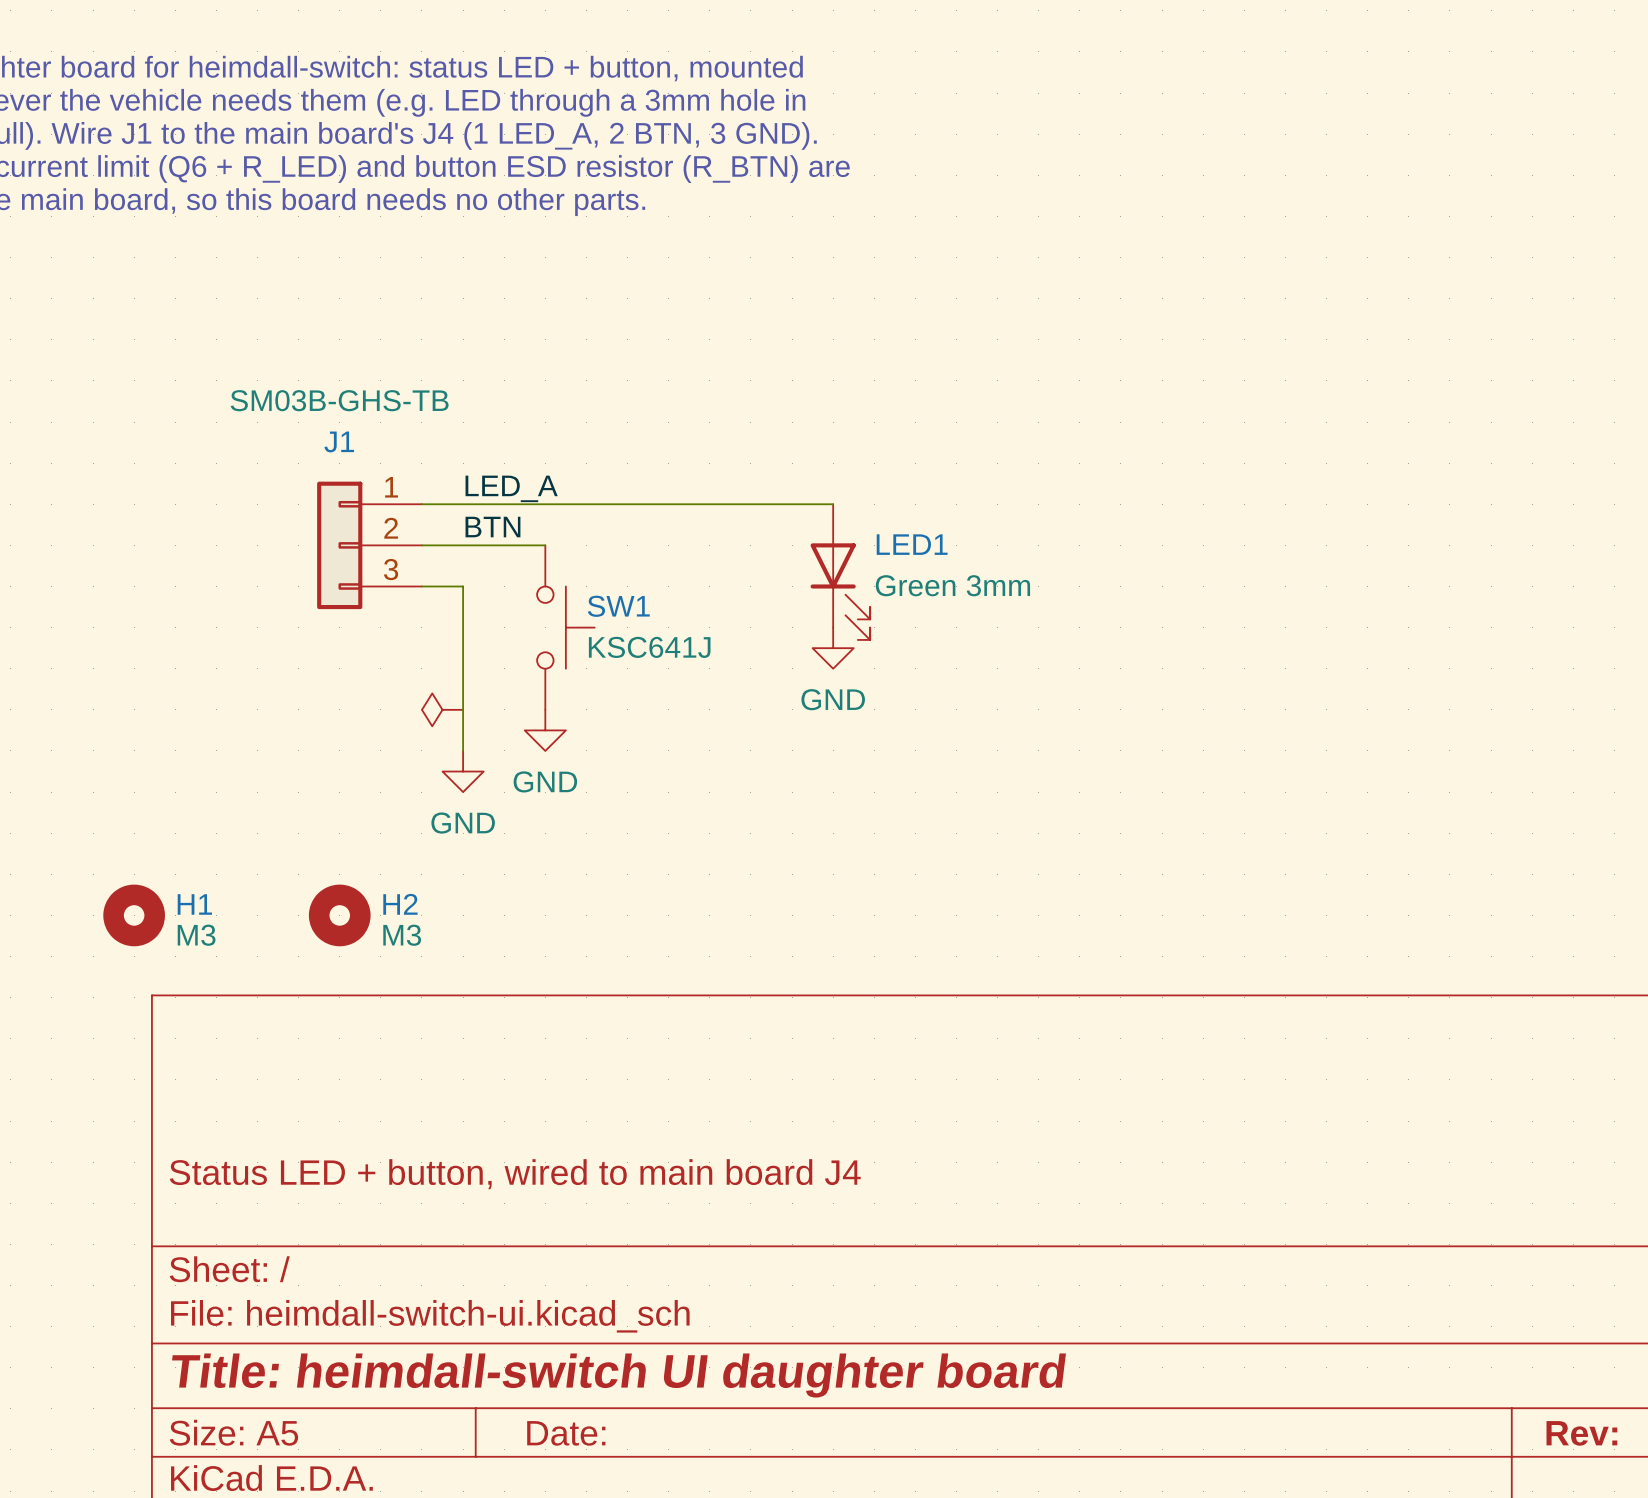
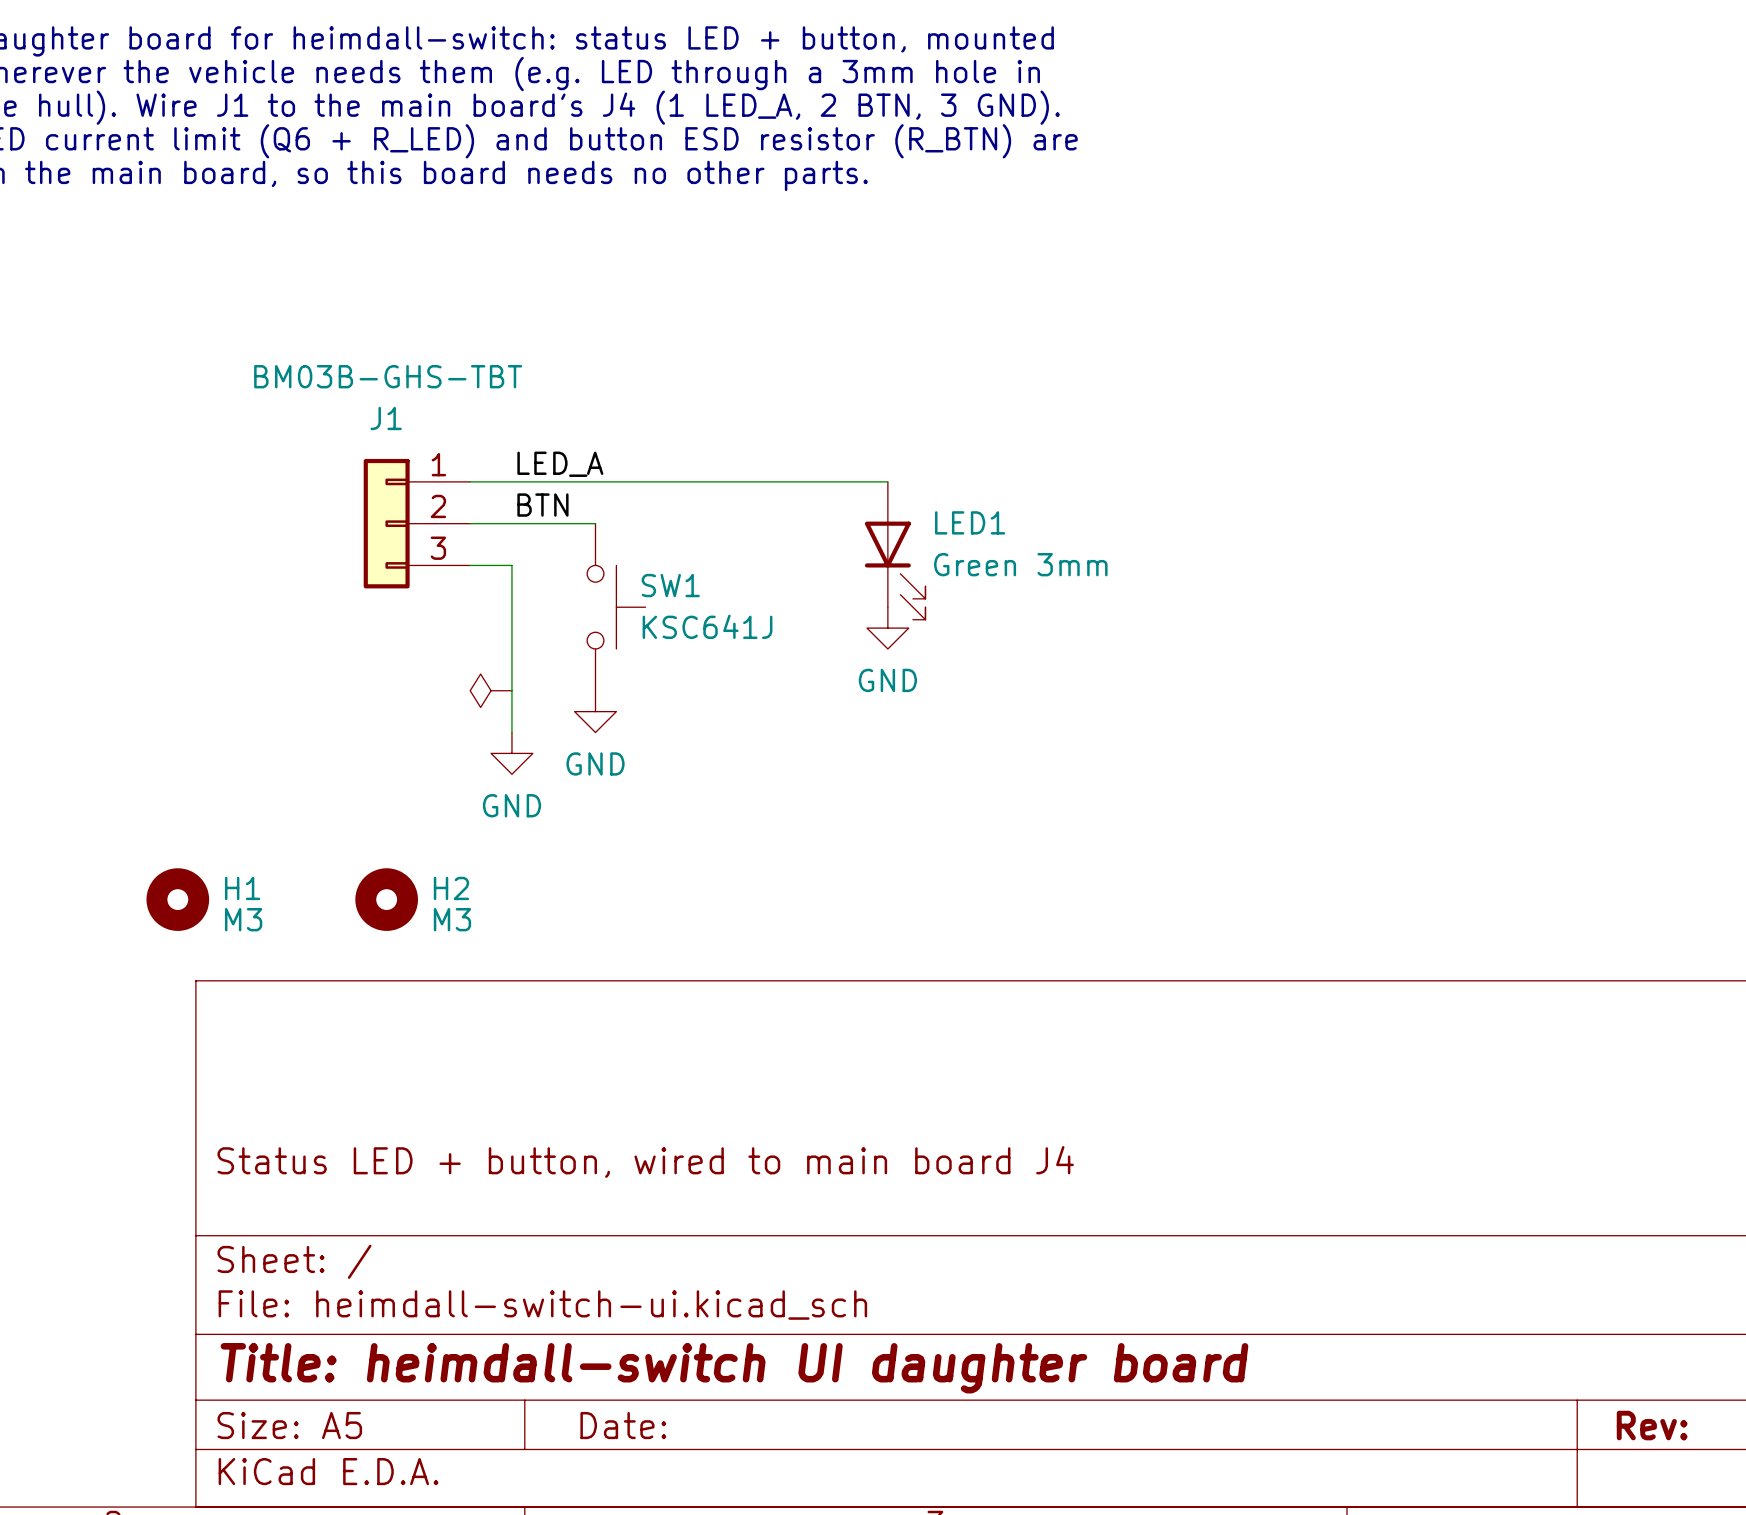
J1 value: SM03B-GHS-TB (339, 400) -> BM03B-GHS-TBT (388, 376)

